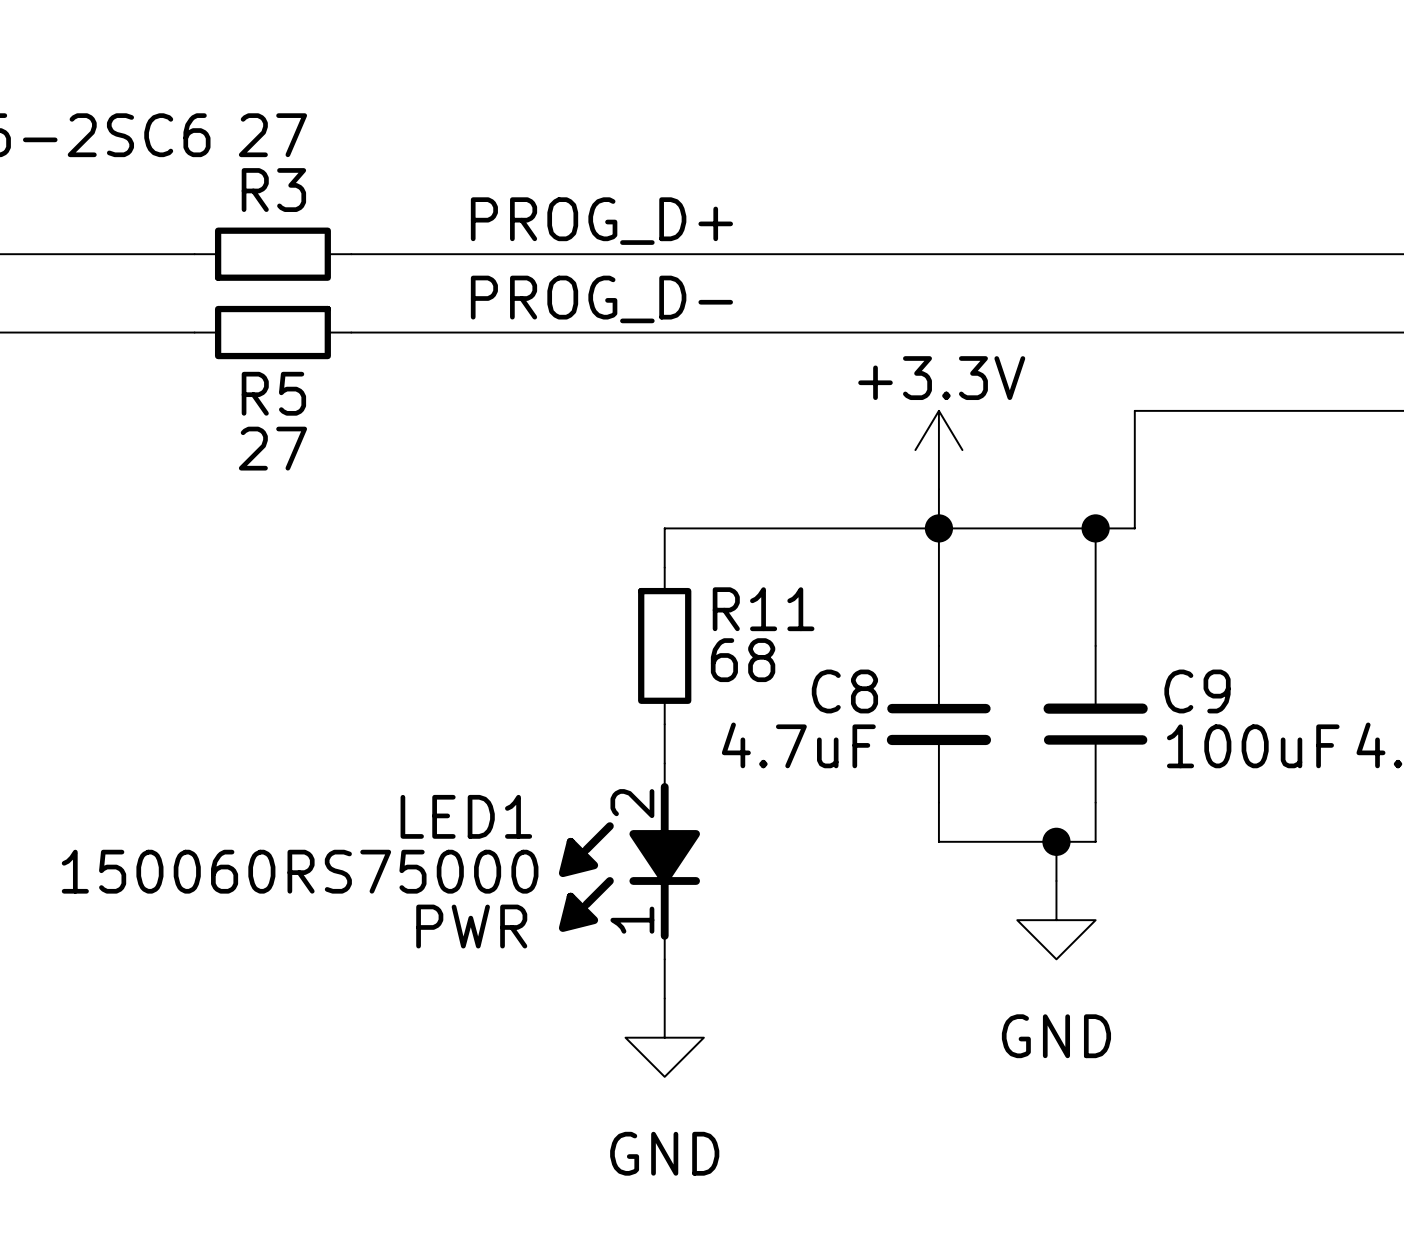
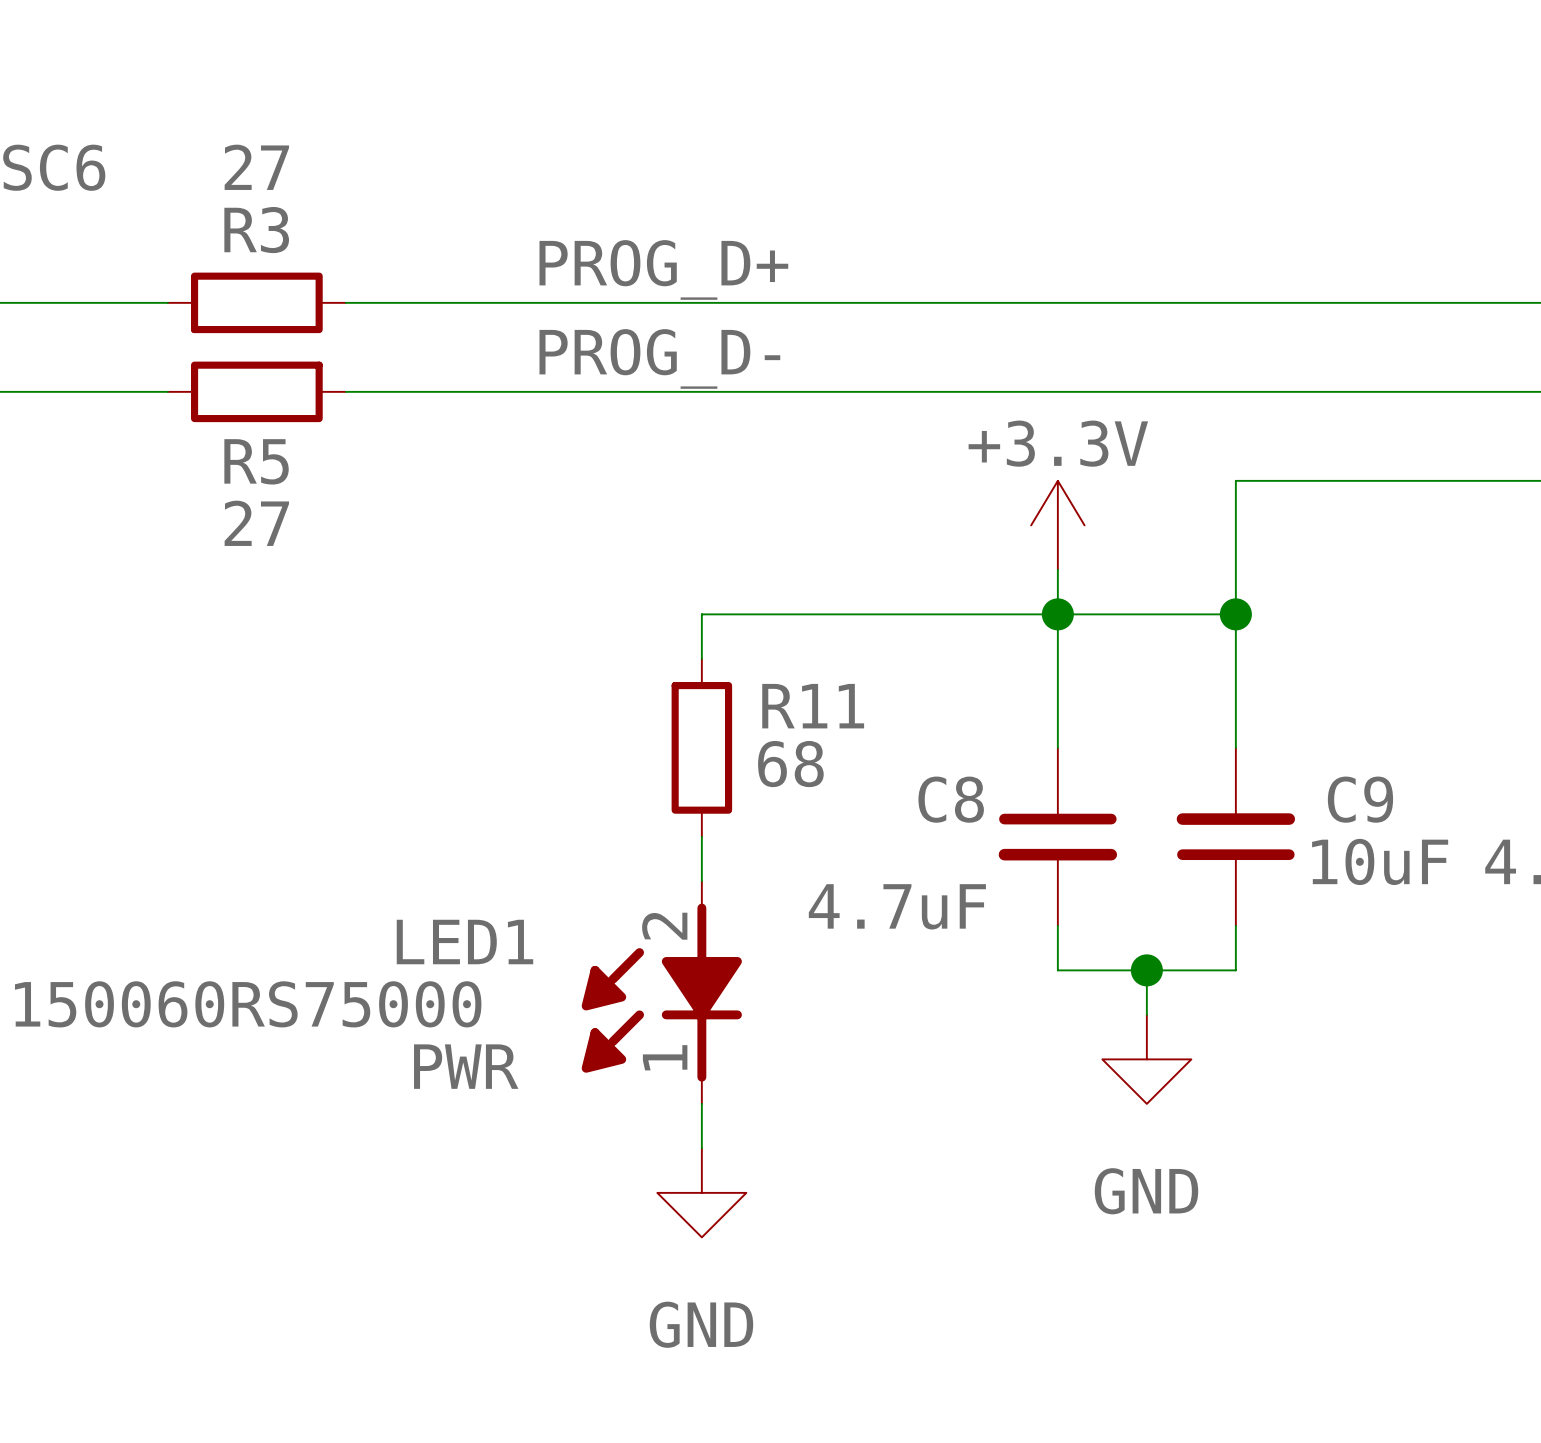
power symbol position: +3.3V (938, 450) -> +3.3V (1057, 525)
wire: (938, 489) (938, 645) -> (1057, 569) (1057, 747)
junction position: (938, 528) -> (1057, 614)
wire: (1095, 528) (1095, 645) -> (1235, 614) (1235, 747)
junction position: (1095, 528) -> (1235, 614)
C9 name position: C9 (1197, 691) -> C9 (1360, 799)
C8 position: (938, 724) -> (1057, 836)
C9 position: (1095, 724) -> (1235, 836)
C8 value position: 4.7uF (798, 745) -> 4.7uF (897, 906)
C9 value: 100uF (1253, 746) -> 10uF (1380, 861)
wire: (938, 802) (938, 841) (978, 841) -> (1057, 925) (1057, 970)
wire: (1095, 802) (1095, 841) -> (1235, 925) (1235, 970) (1191, 970)

